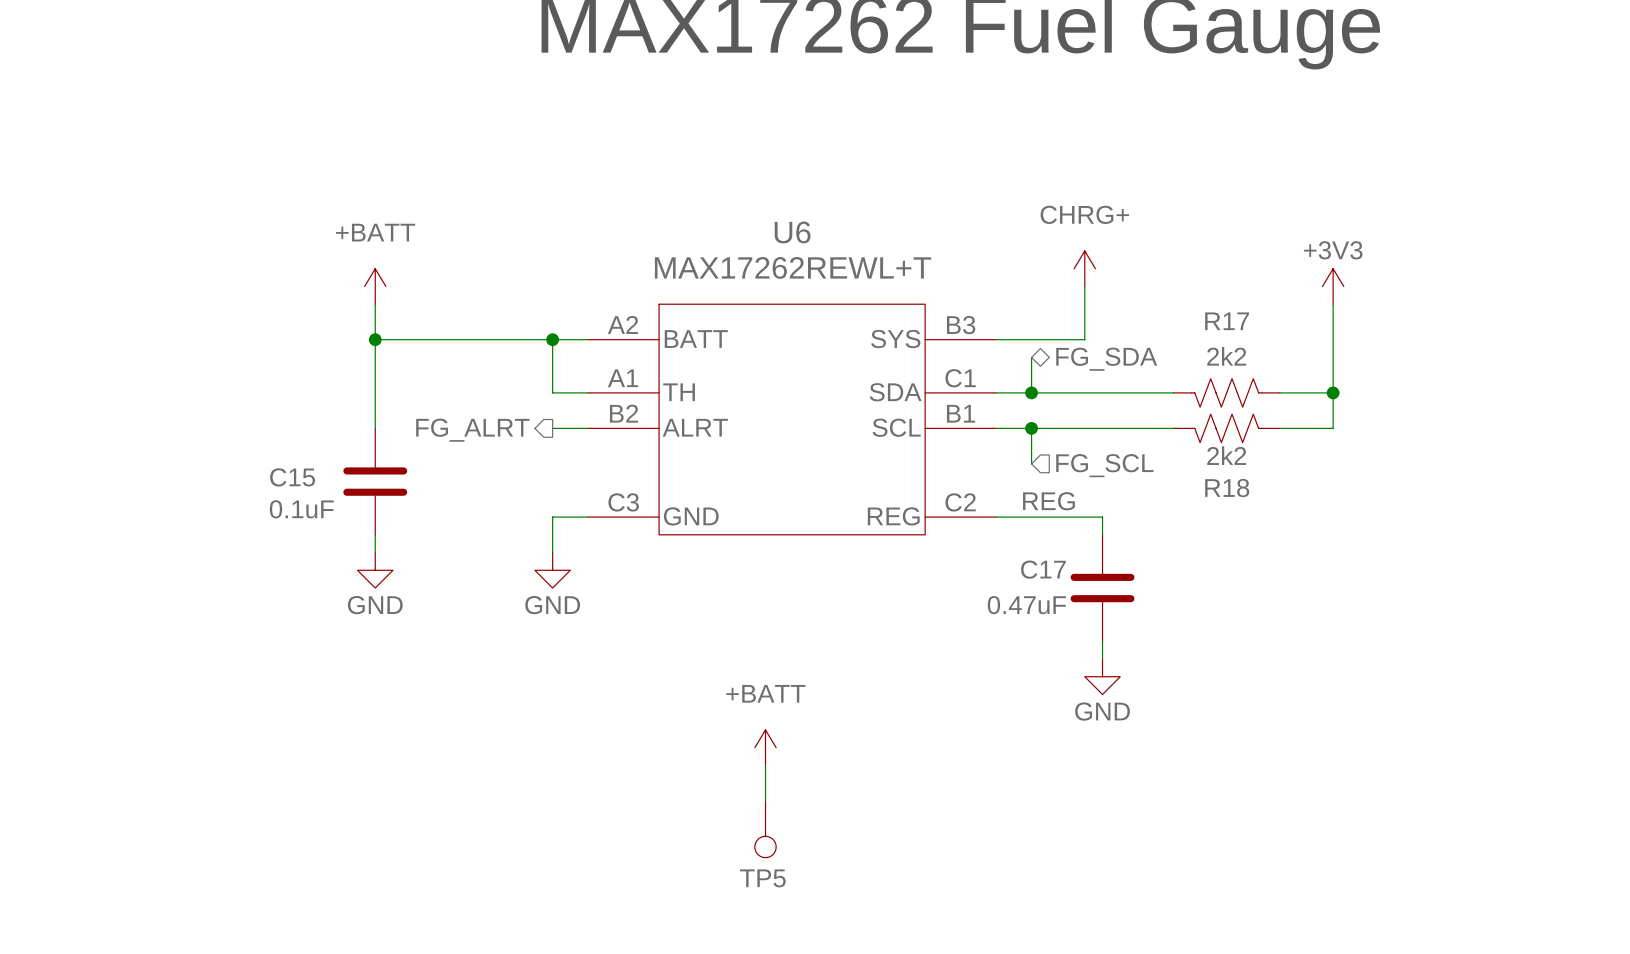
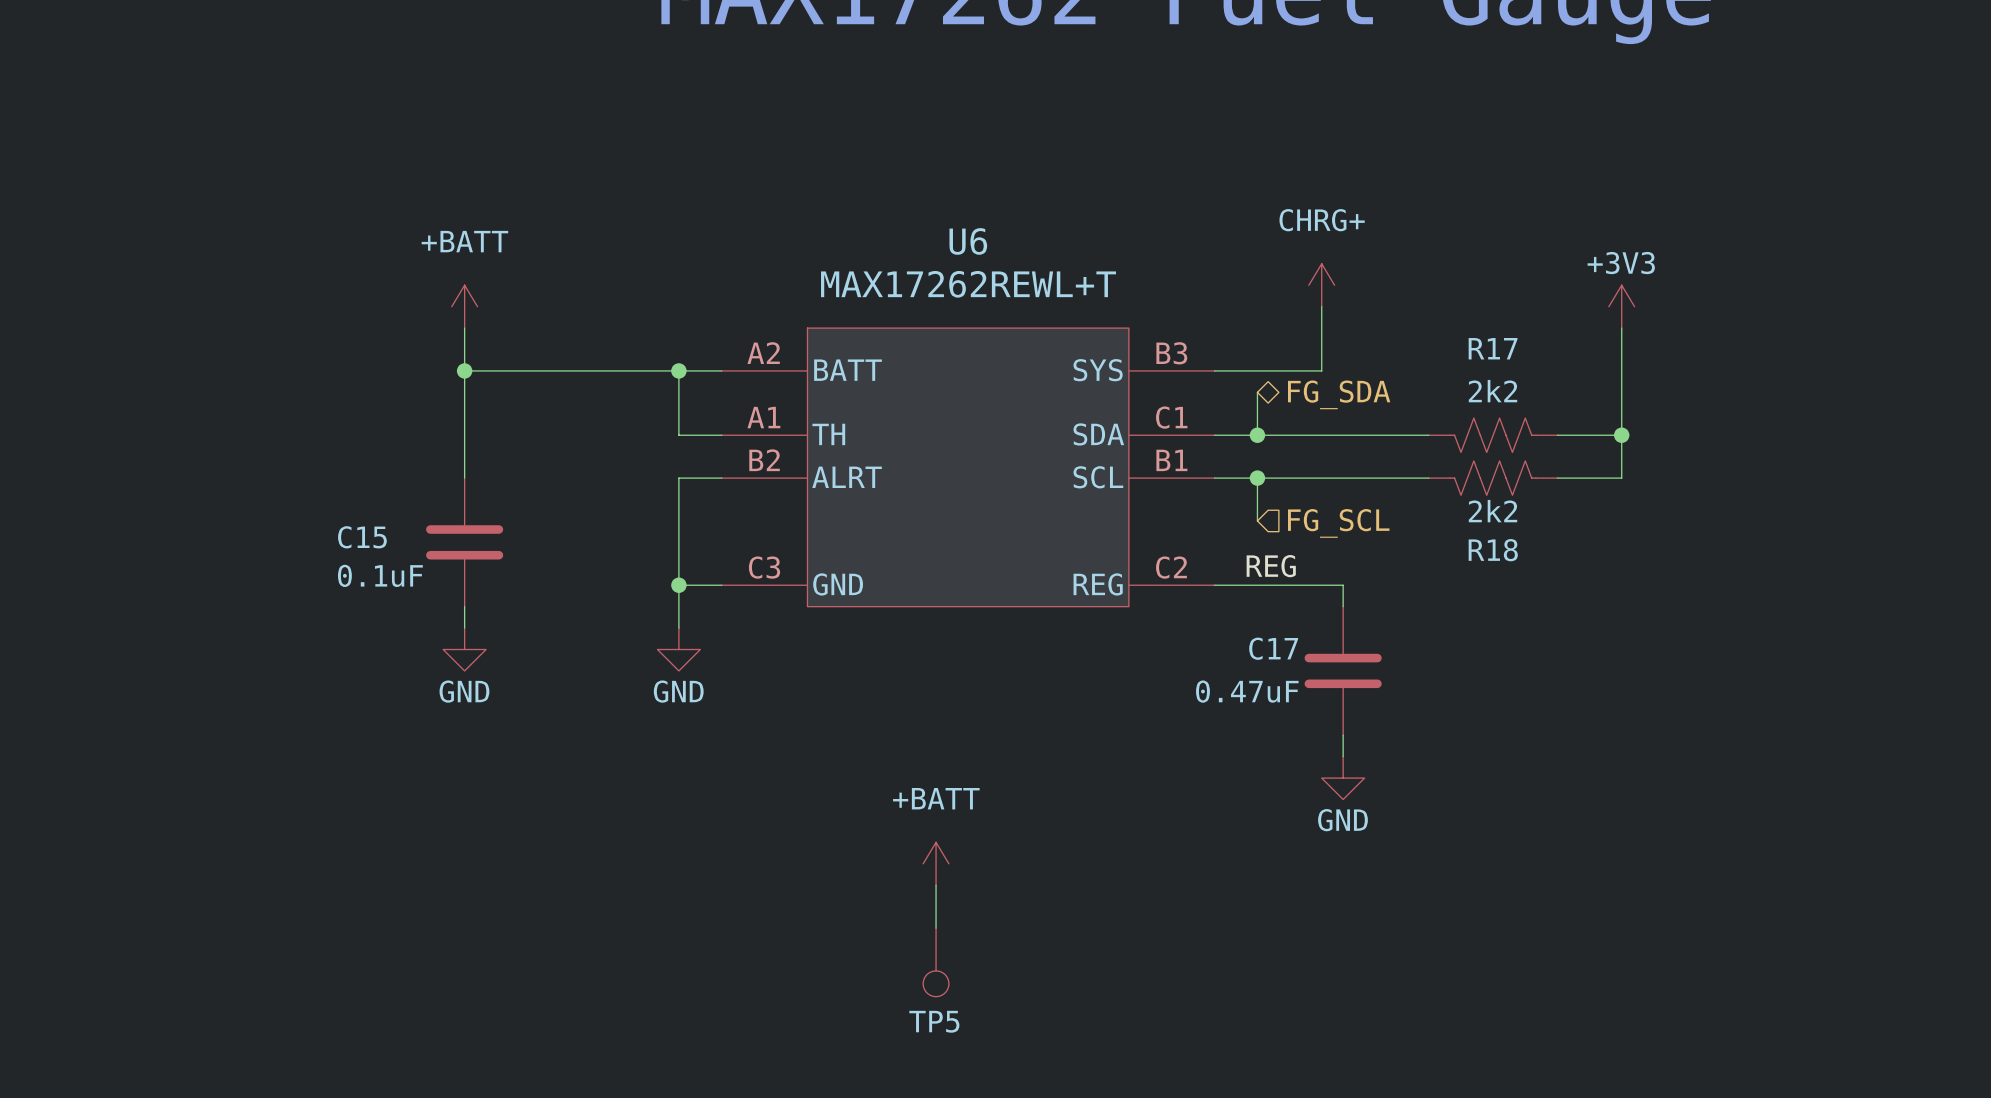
wire: none -> (678, 478) (678, 585)
hierarchical label: FG_ALRT (472, 430) -> none
junction: none -> (678, 585)

